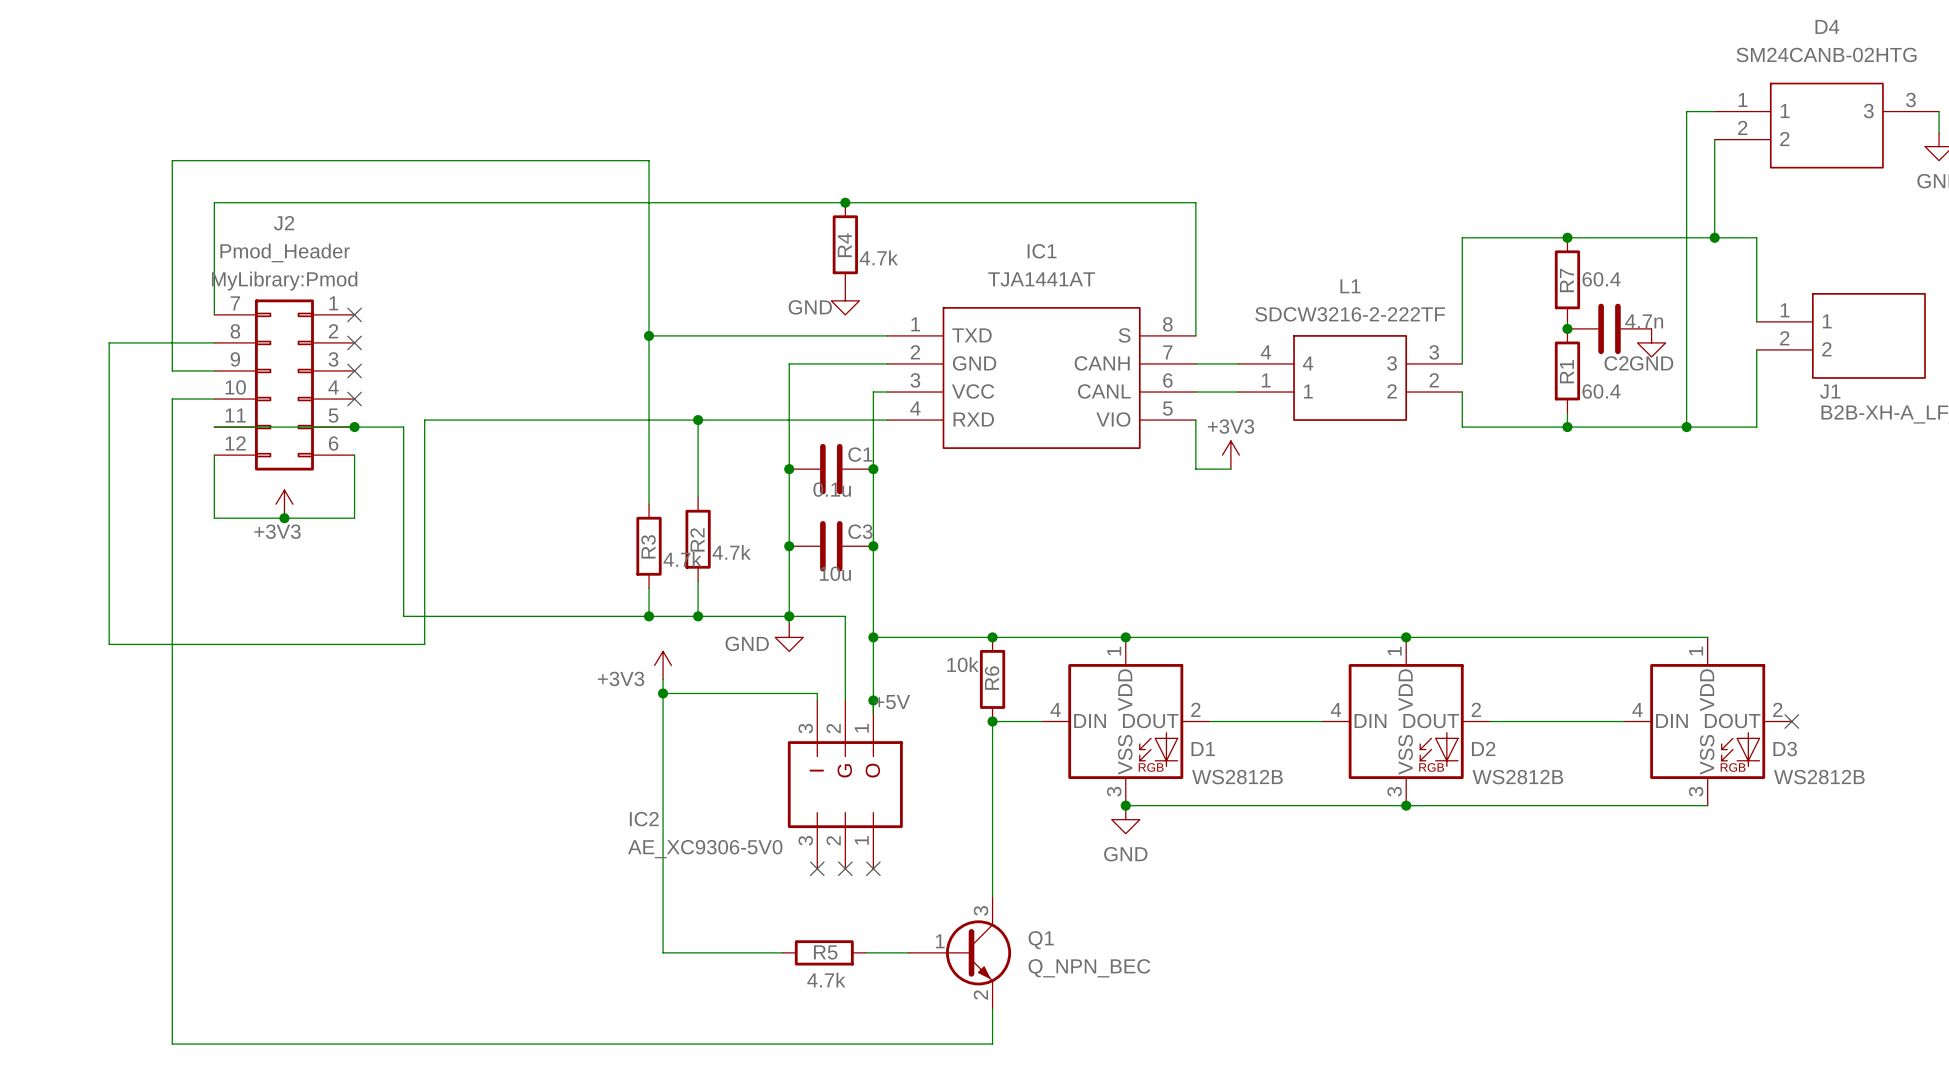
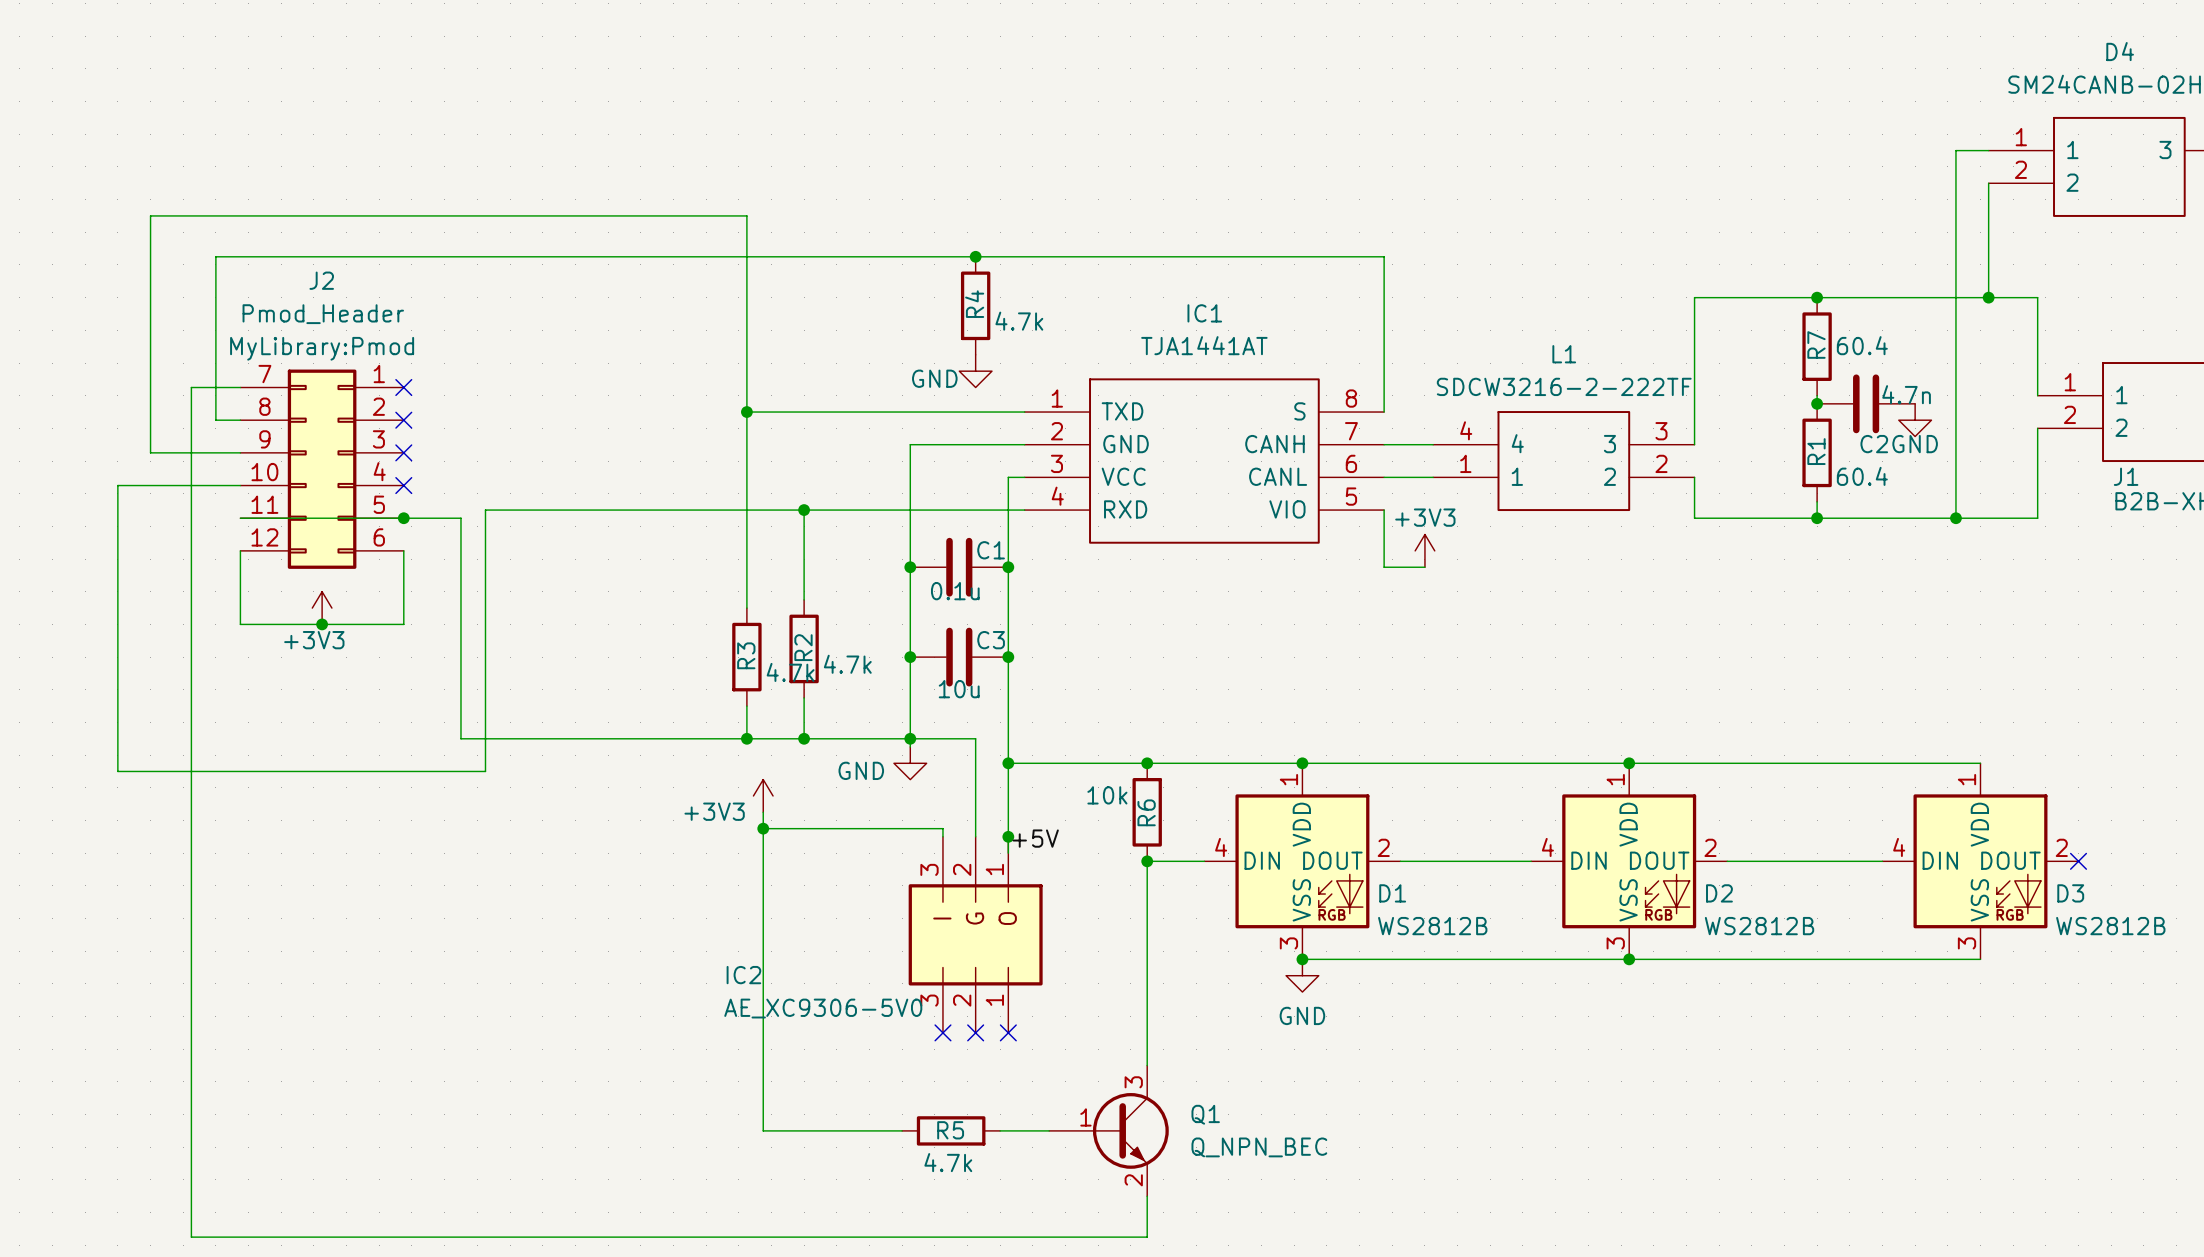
wire: (649, 167) (649, 160) (172, 160) (172, 314) -> (746, 215) (150, 215) (150, 452) (191, 452) (191, 485) (117, 485)
wire: (214, 202) (214, 314) -> (240, 256) (215, 256) (215, 420)
wire: none -> (191, 387) (240, 387)
wire: (193, 342) (109, 342) (109, 399) -> none

